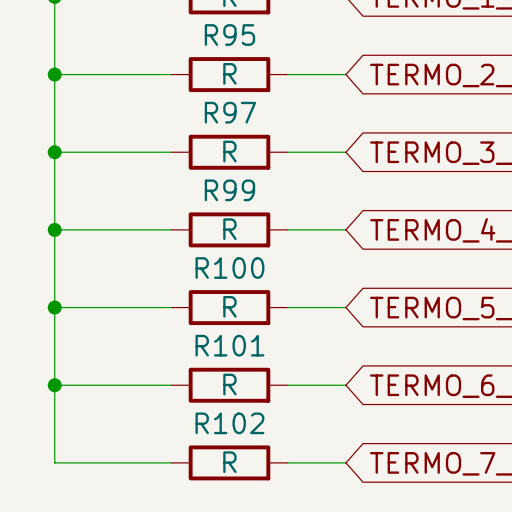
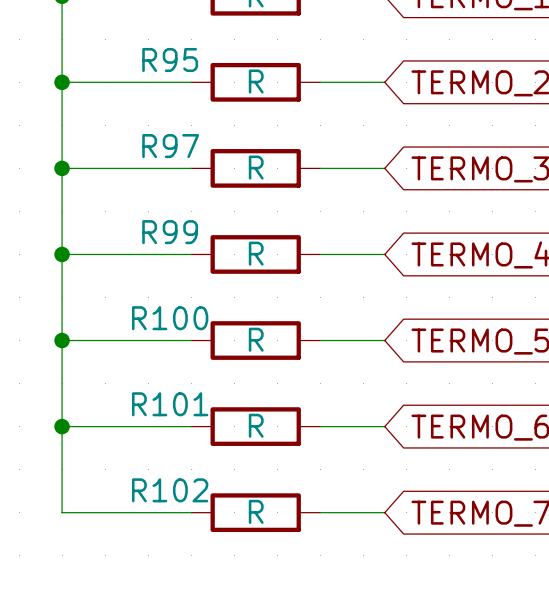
R95 name position: R95 (229, 35) -> R95 (170, 60)
R97 name position: R97 (230, 112) -> R97 (170, 146)
R99 name position: R99 (229, 190) -> R99 (170, 232)
R100 name position: R100 (229, 268) -> R100 (170, 318)
R101 name position: R101 (229, 345) -> R101 (170, 404)
R102 name position: R102 (229, 423) -> R102 (170, 490)

